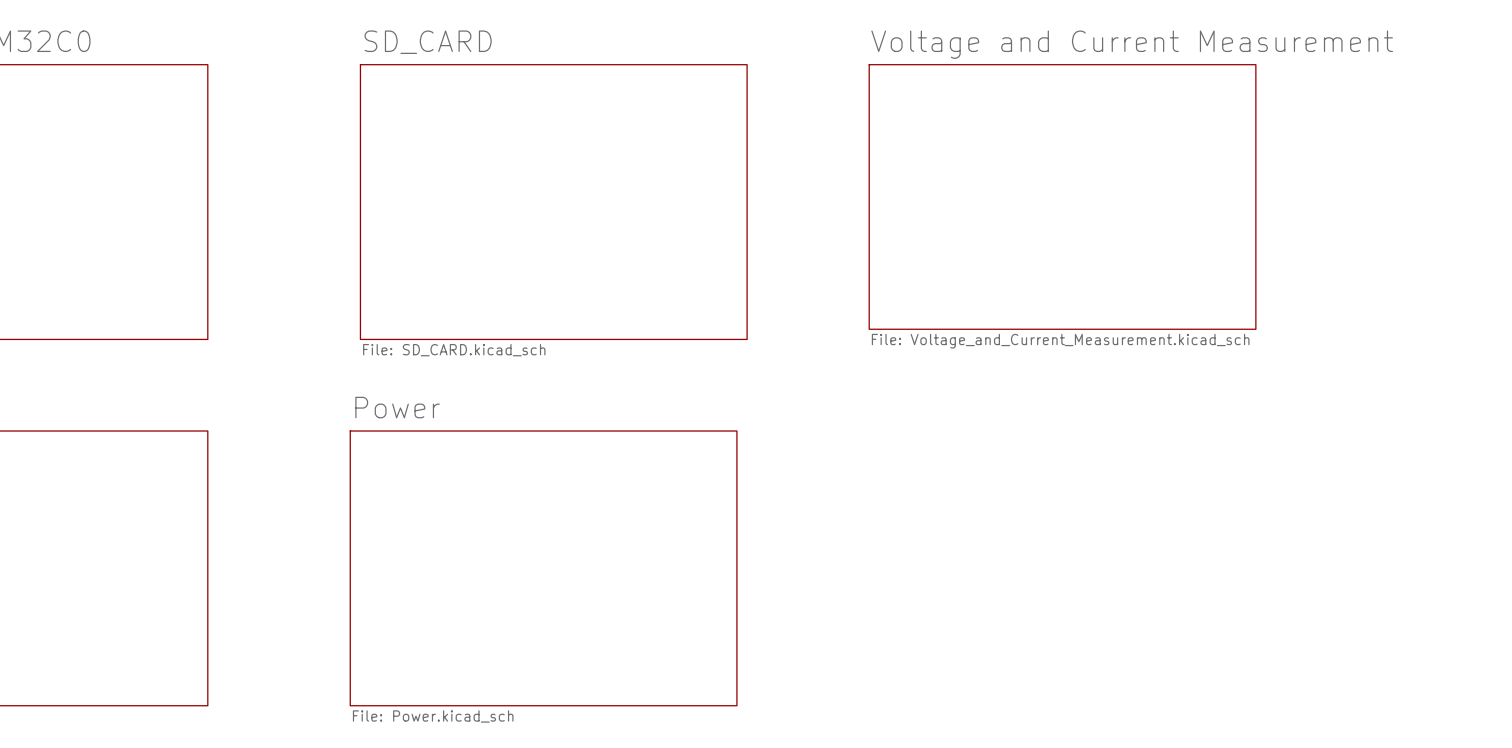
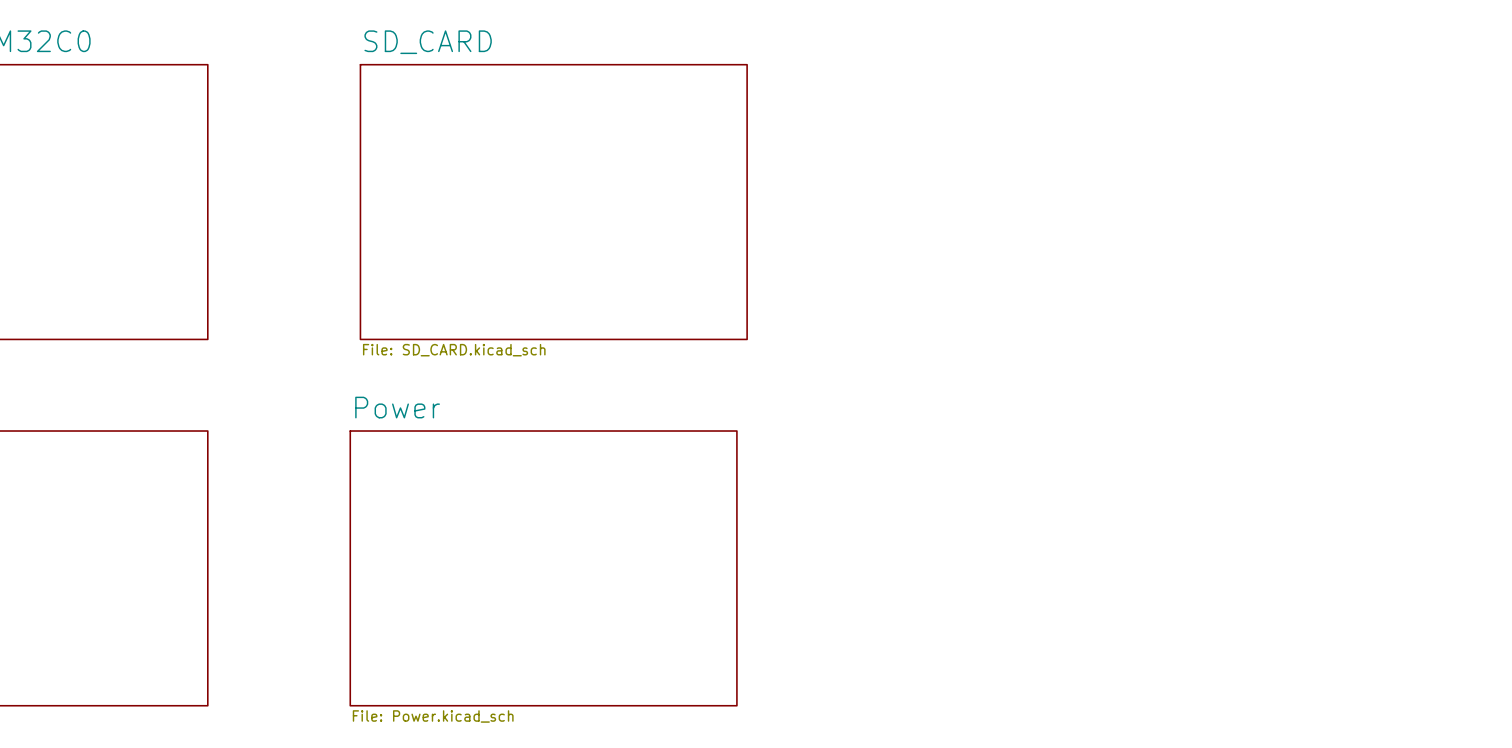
sheet Voltage and Current Measurement: File: Voltage_and_Current_Measurement.kicad_sch (1062, 196) -> none

